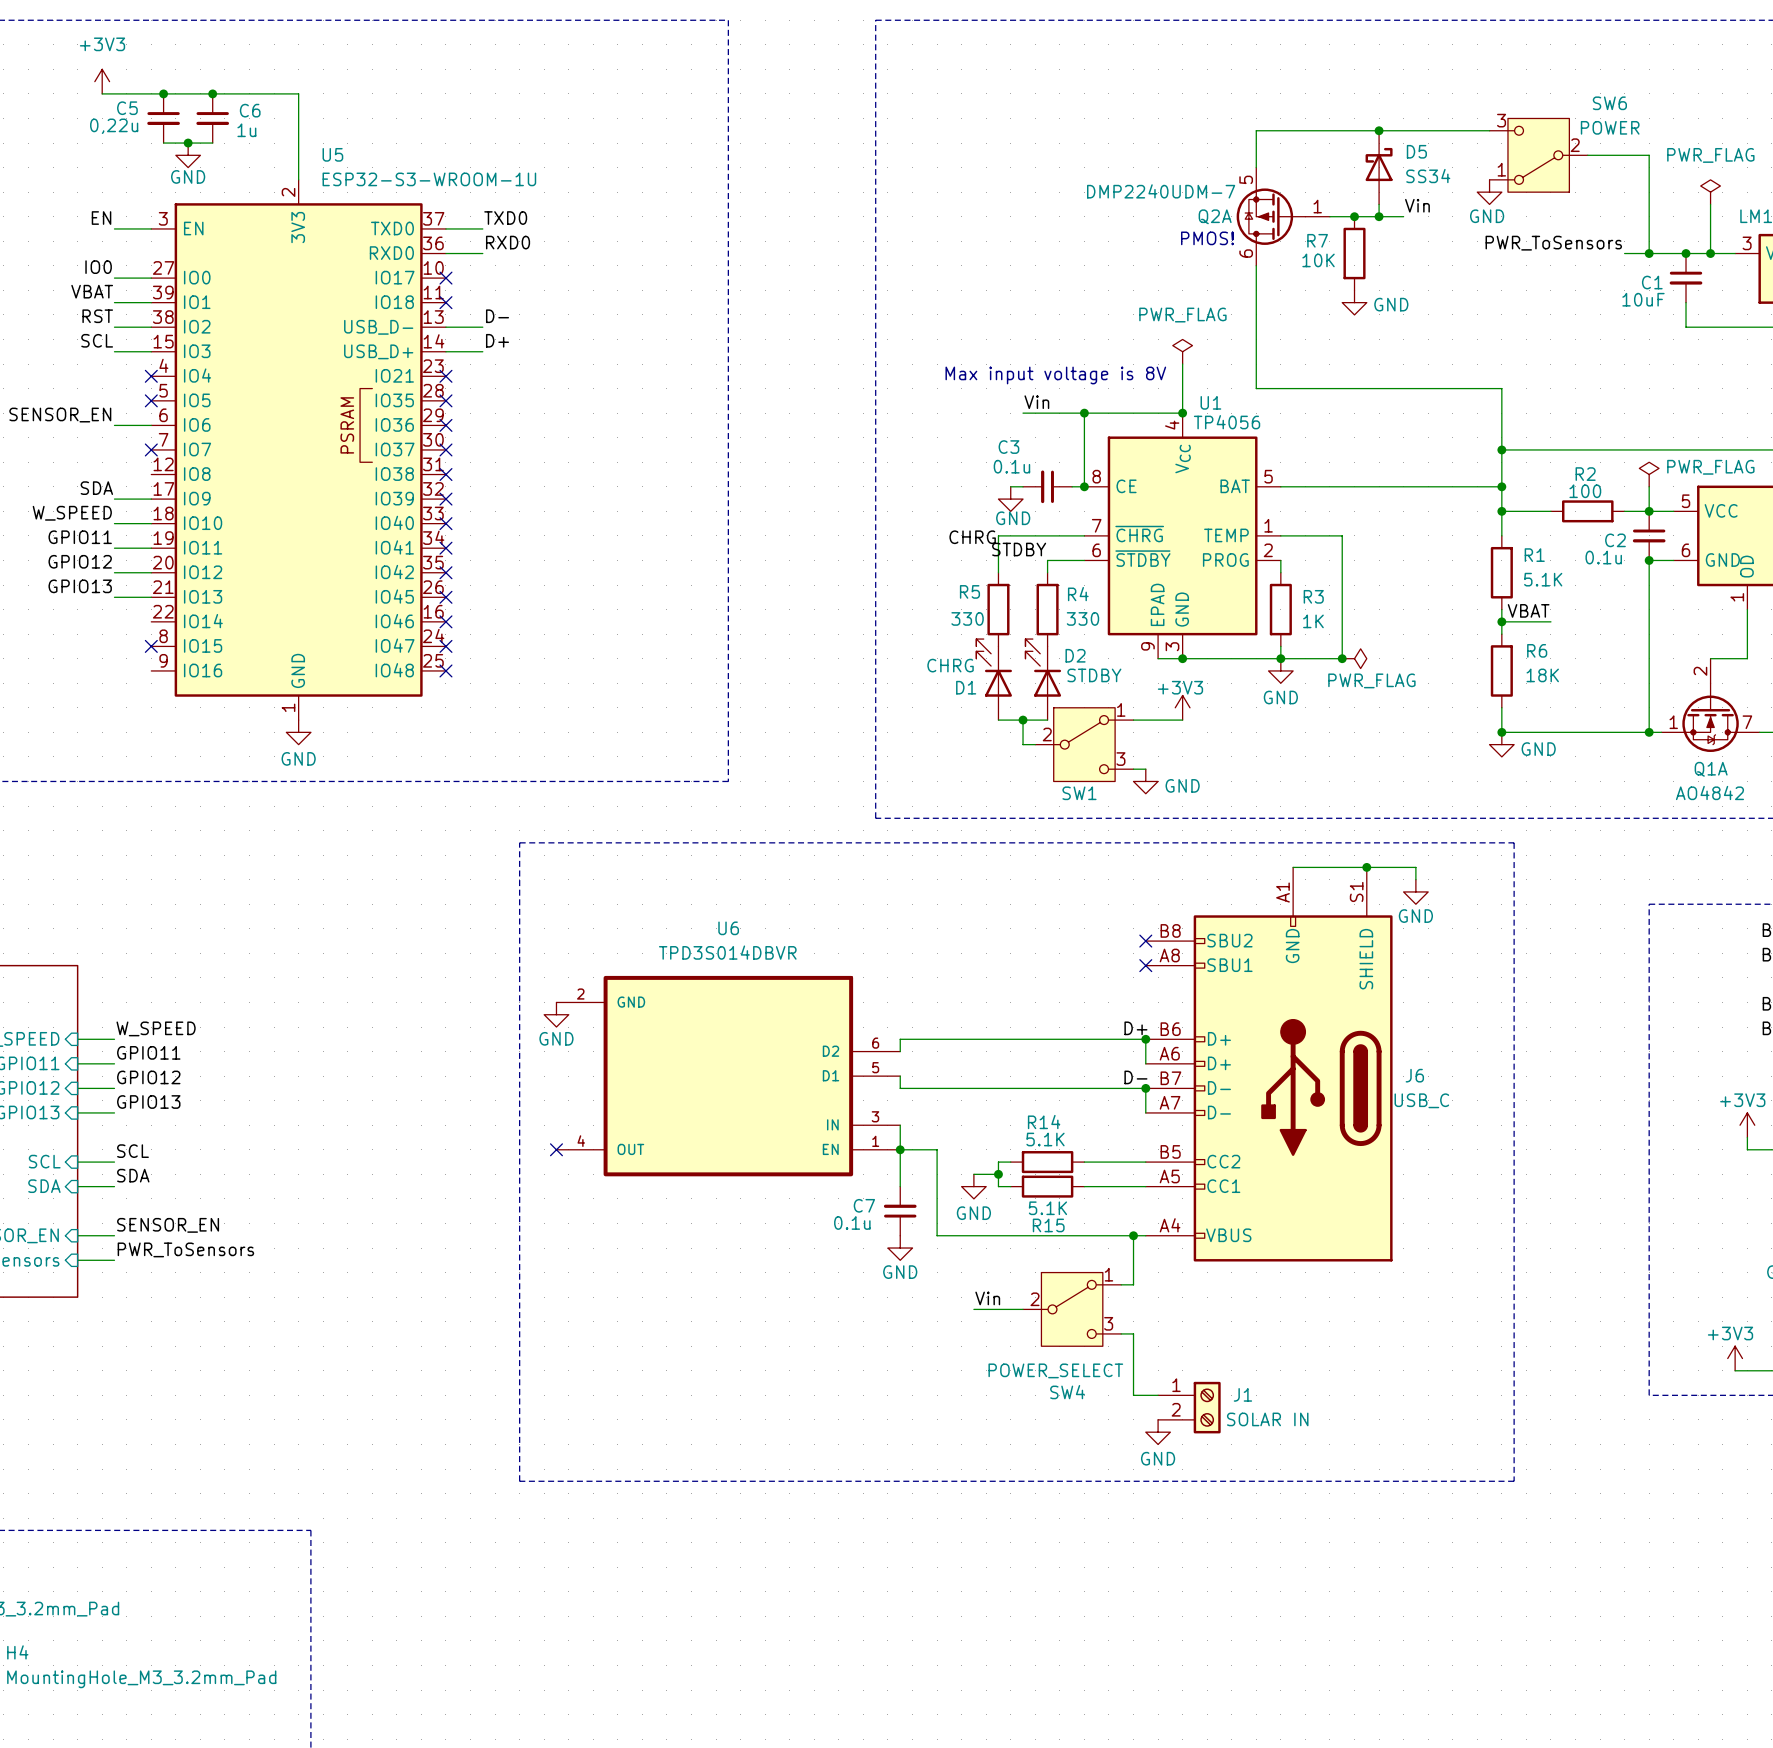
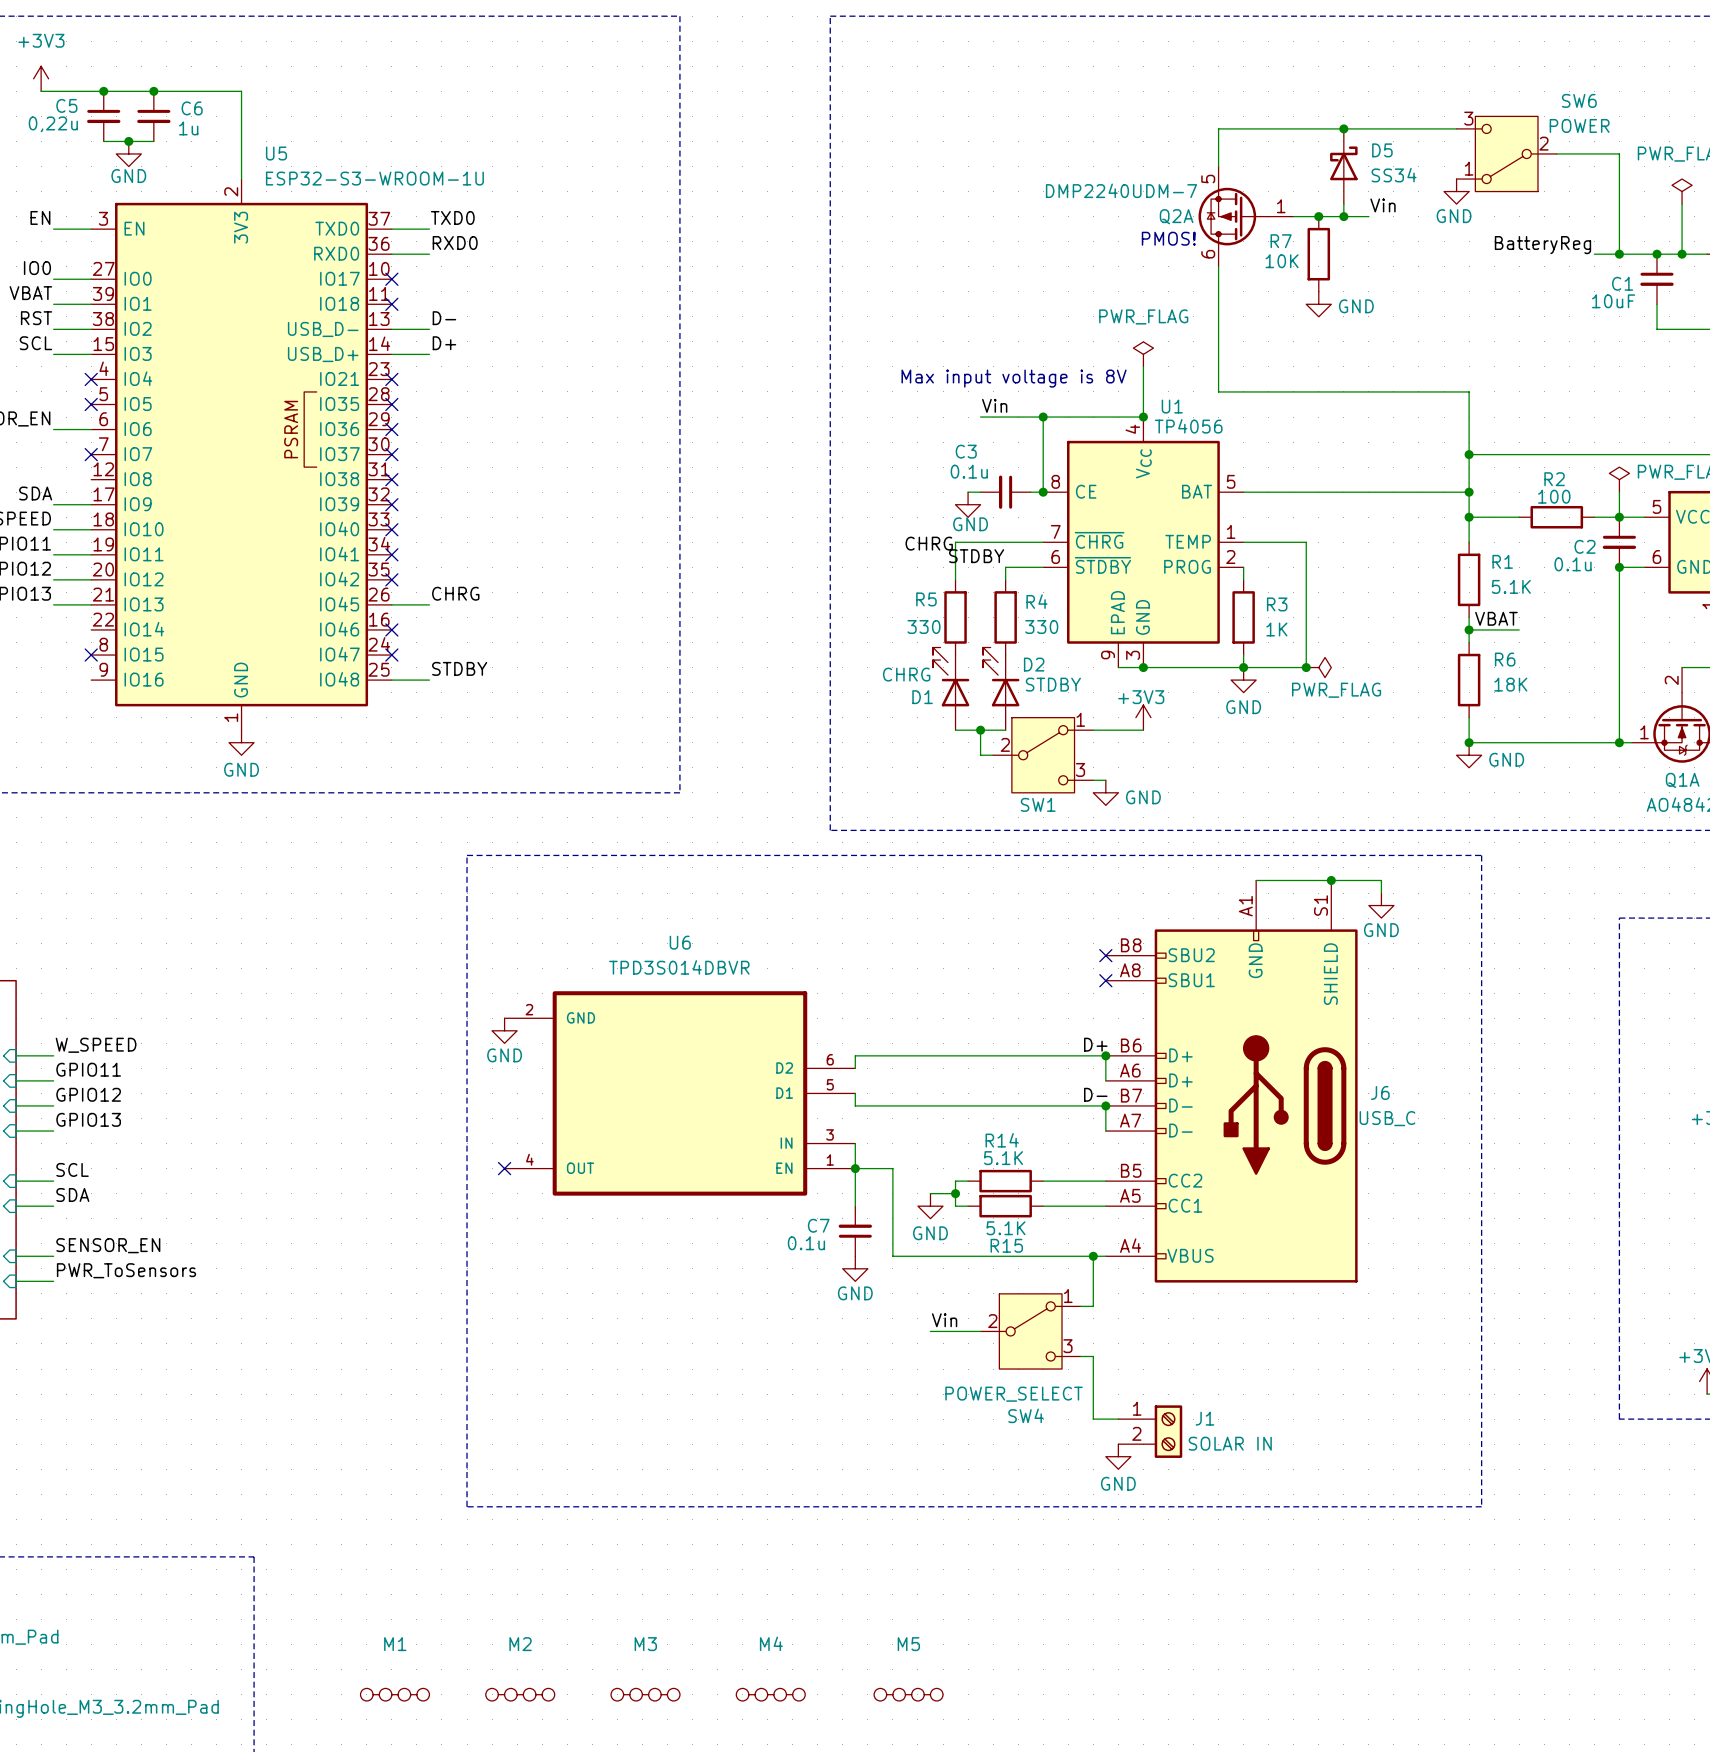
label: PWR_ToSensors (1553, 243) -> BatteryReg (1542, 245)
label: none -> CHRG (455, 593)
wire: none -> (391, 604) (429, 604)
no-connect mark: (445, 597) -> none
label: none -> STDBY (459, 668)
wire: none -> (391, 680) (429, 680)
no-connect mark: (445, 670) -> none
M1: none -> (394, 1694)
M2: none -> (520, 1694)
M3: none -> (645, 1694)
M4: none -> (770, 1694)
M5: none -> (908, 1694)

